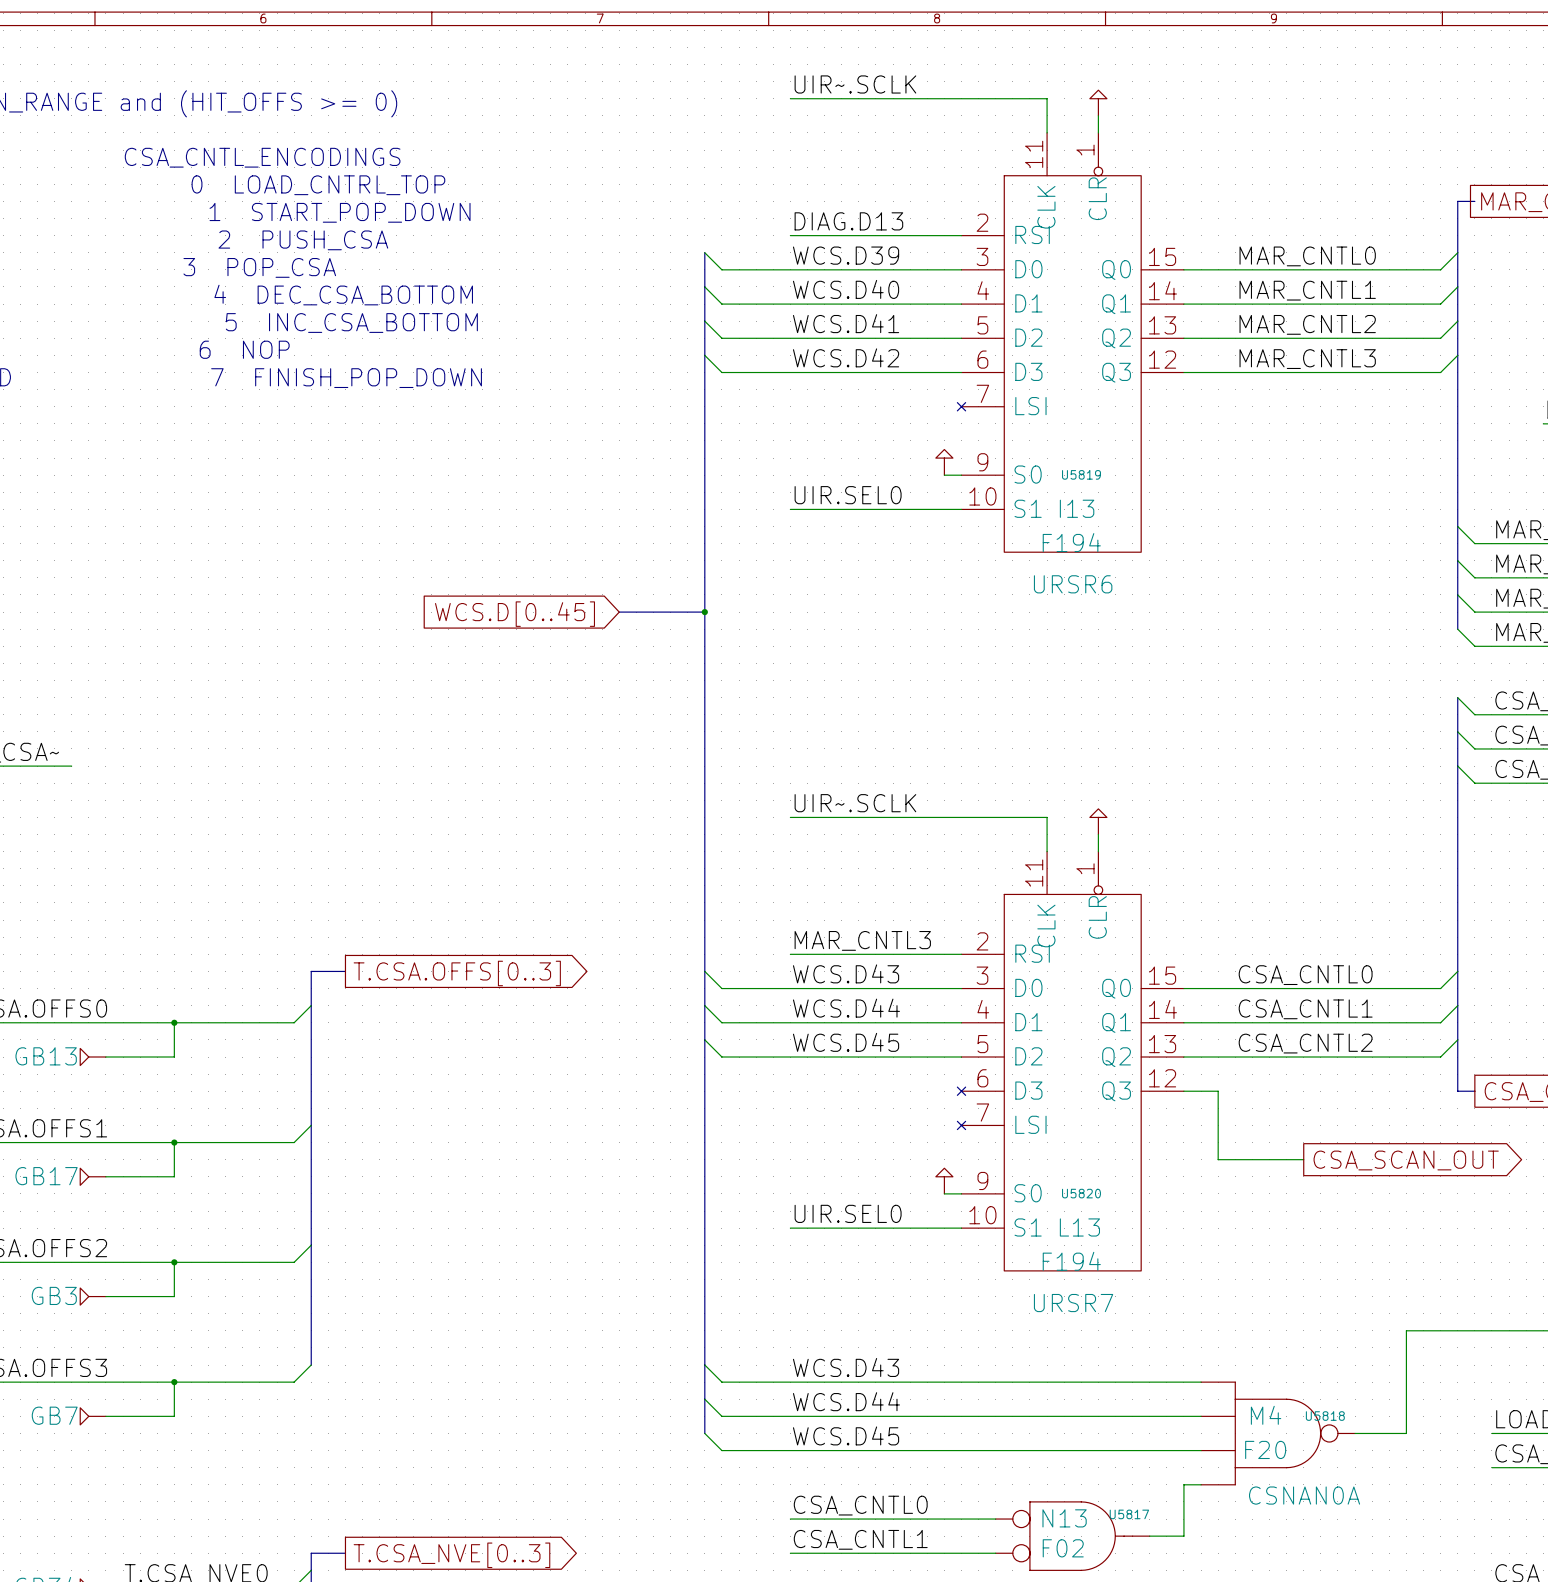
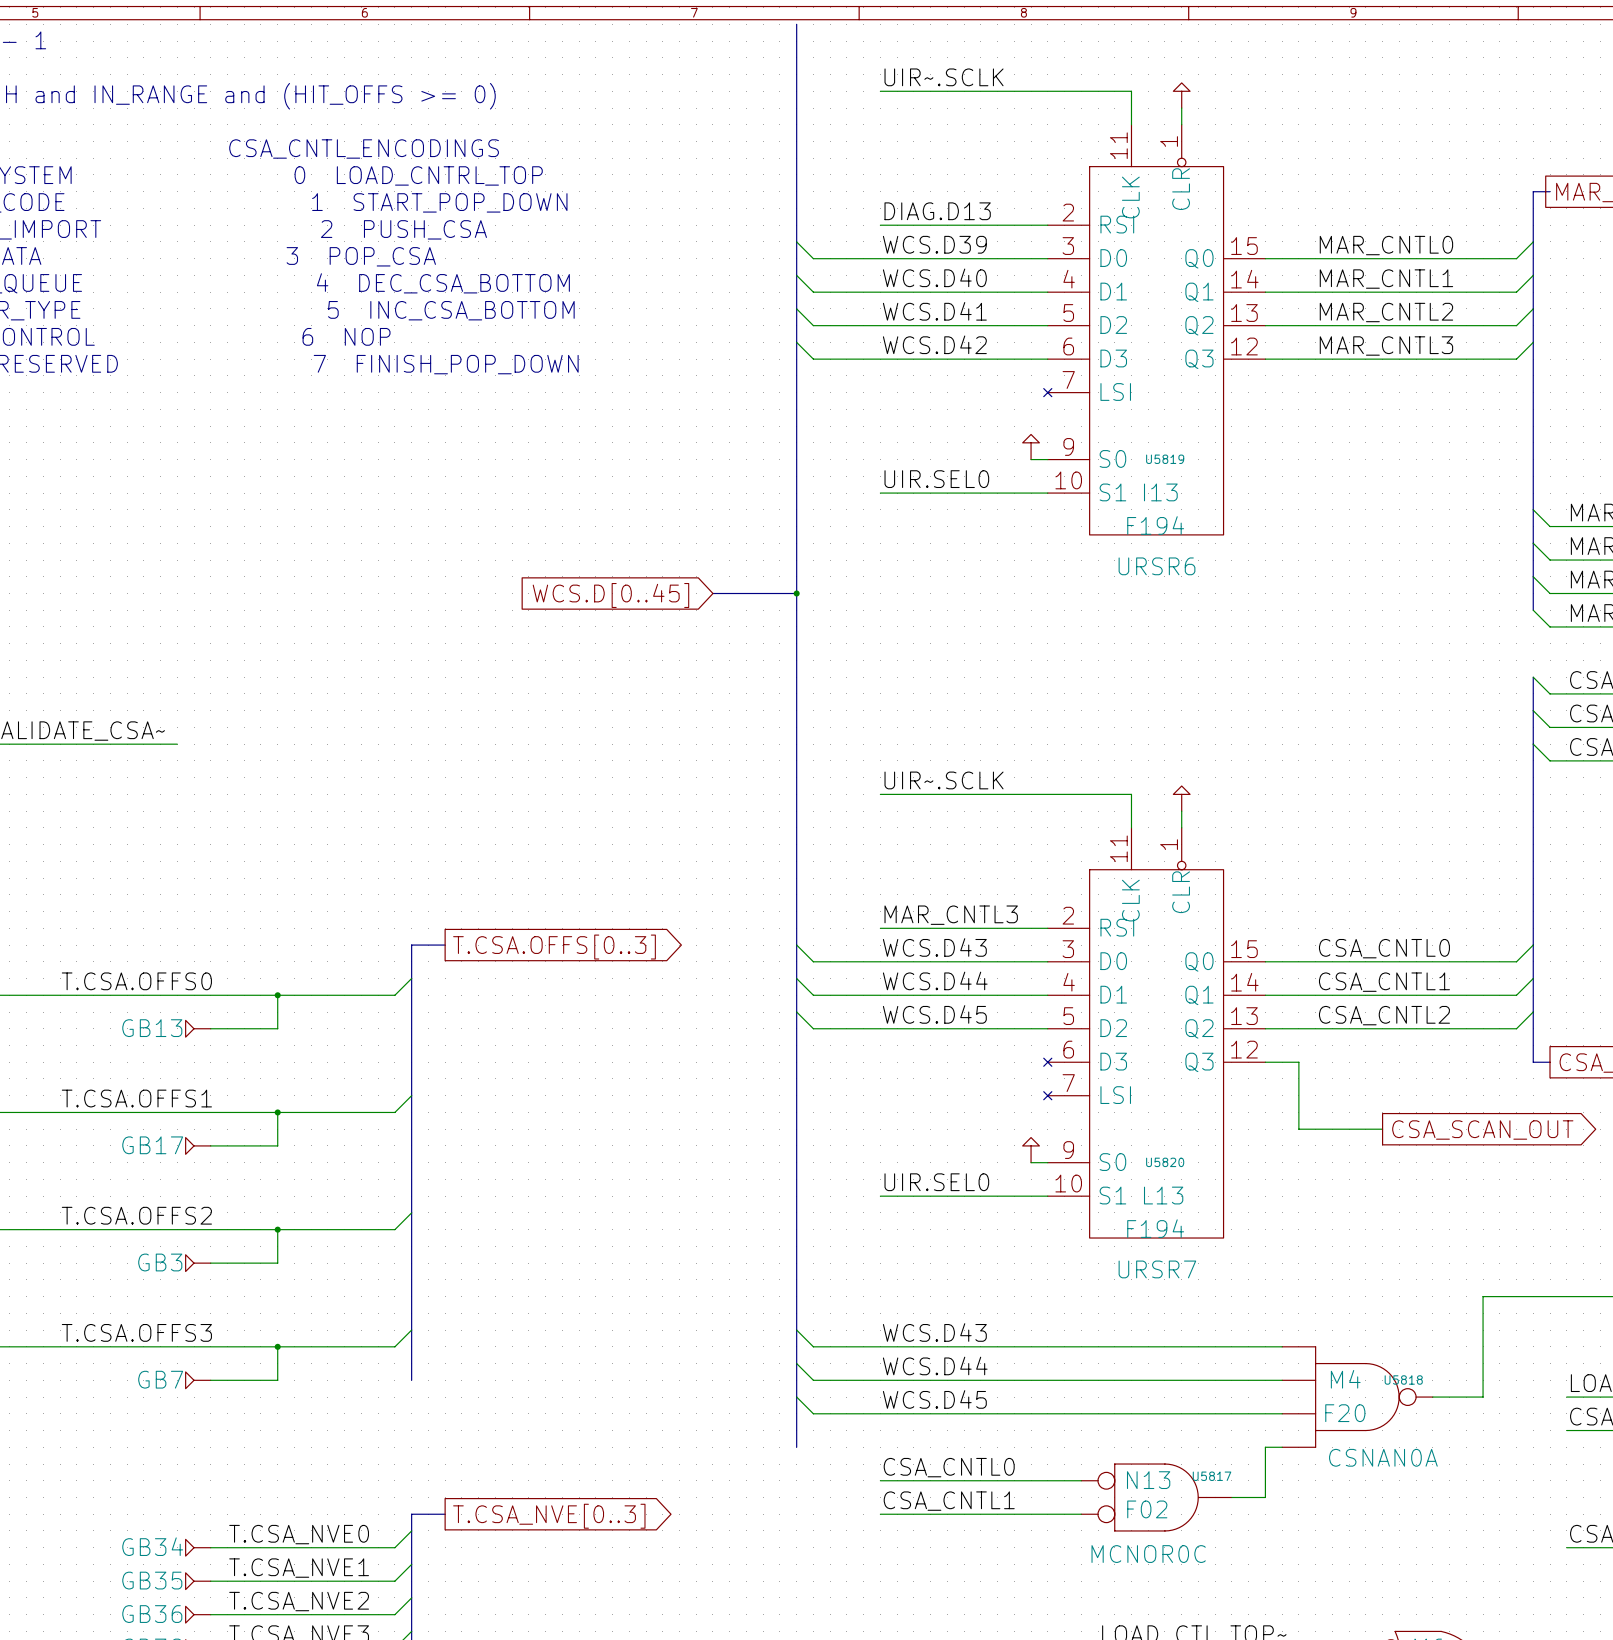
bus: none -> (796, 24) (796, 241)
bus: none -> (411, 1330) (411, 1380)
bus: none -> (796, 1397) (796, 1447)

